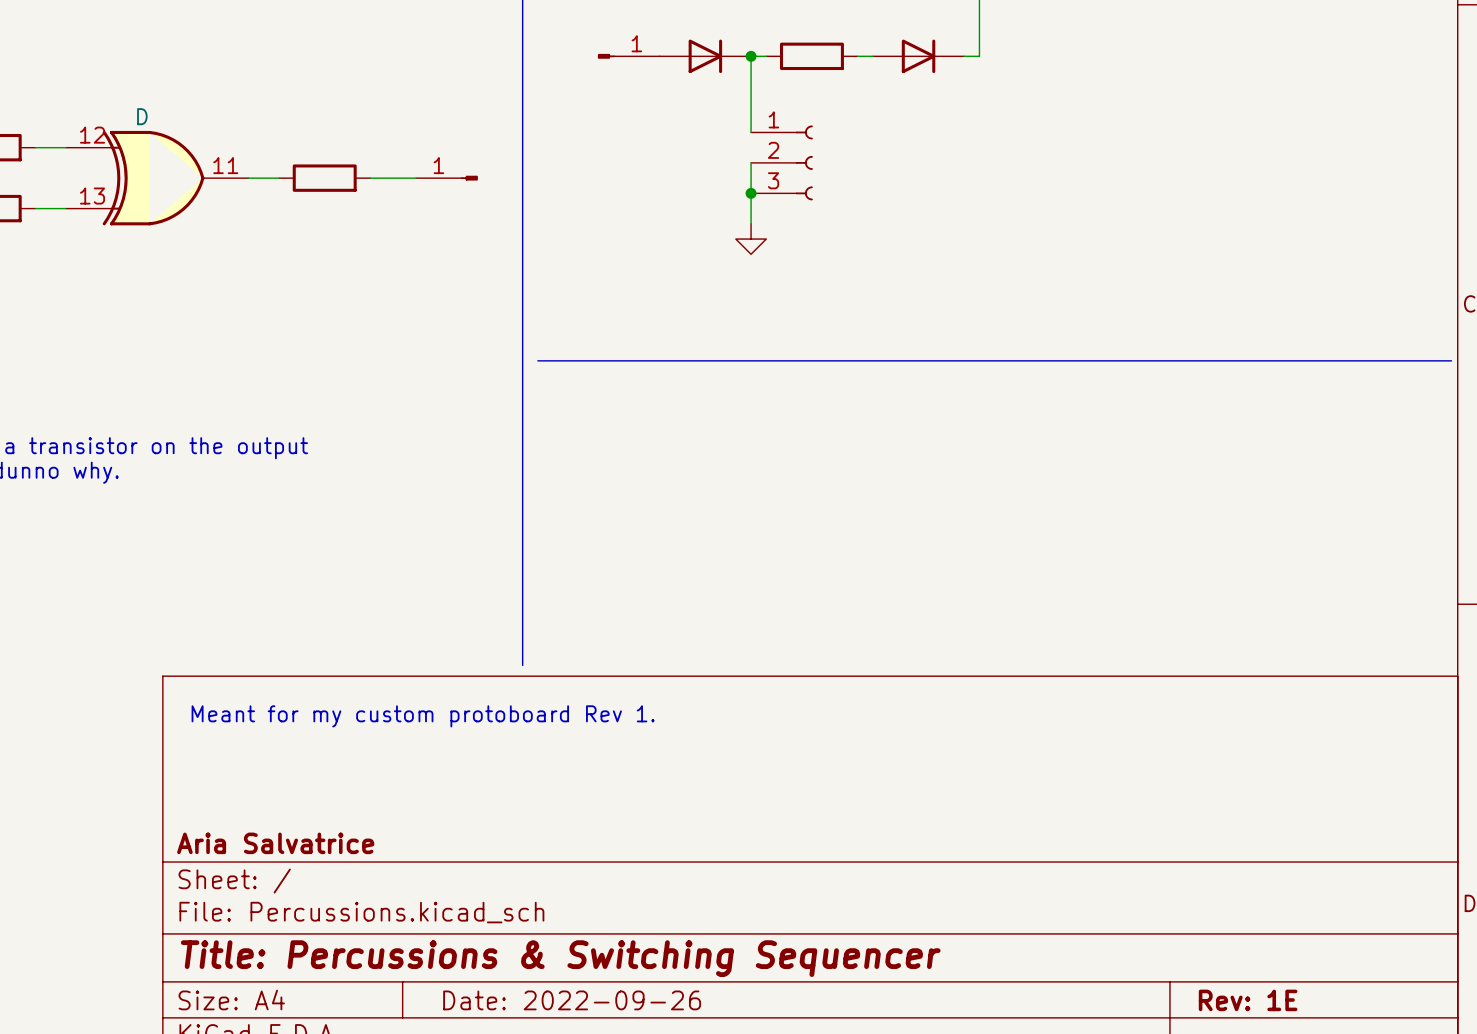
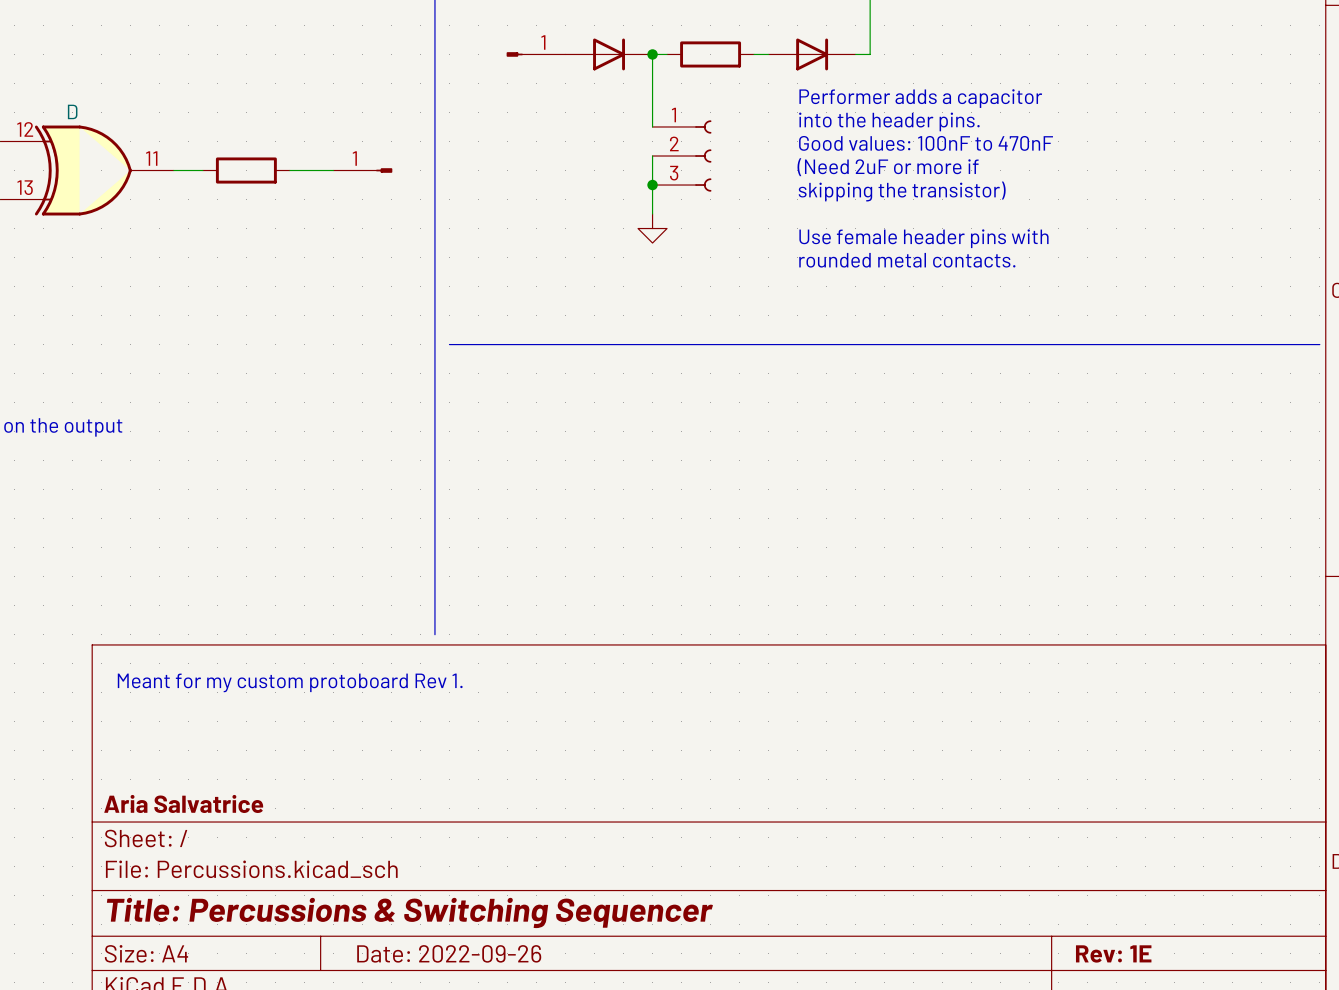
text: none -> Performer adds a capacitor (920, 98)
text: none -> into the header pins. (889, 121)
text: none -> Good values: 100nF to 470nF (926, 143)
text: none -> (Need 2uF or more if (888, 167)
text: none -> skipping the transistor) (902, 191)
text: none -> Use female header pins with (923, 238)
text: none -> rounded metal contacts. (907, 260)

